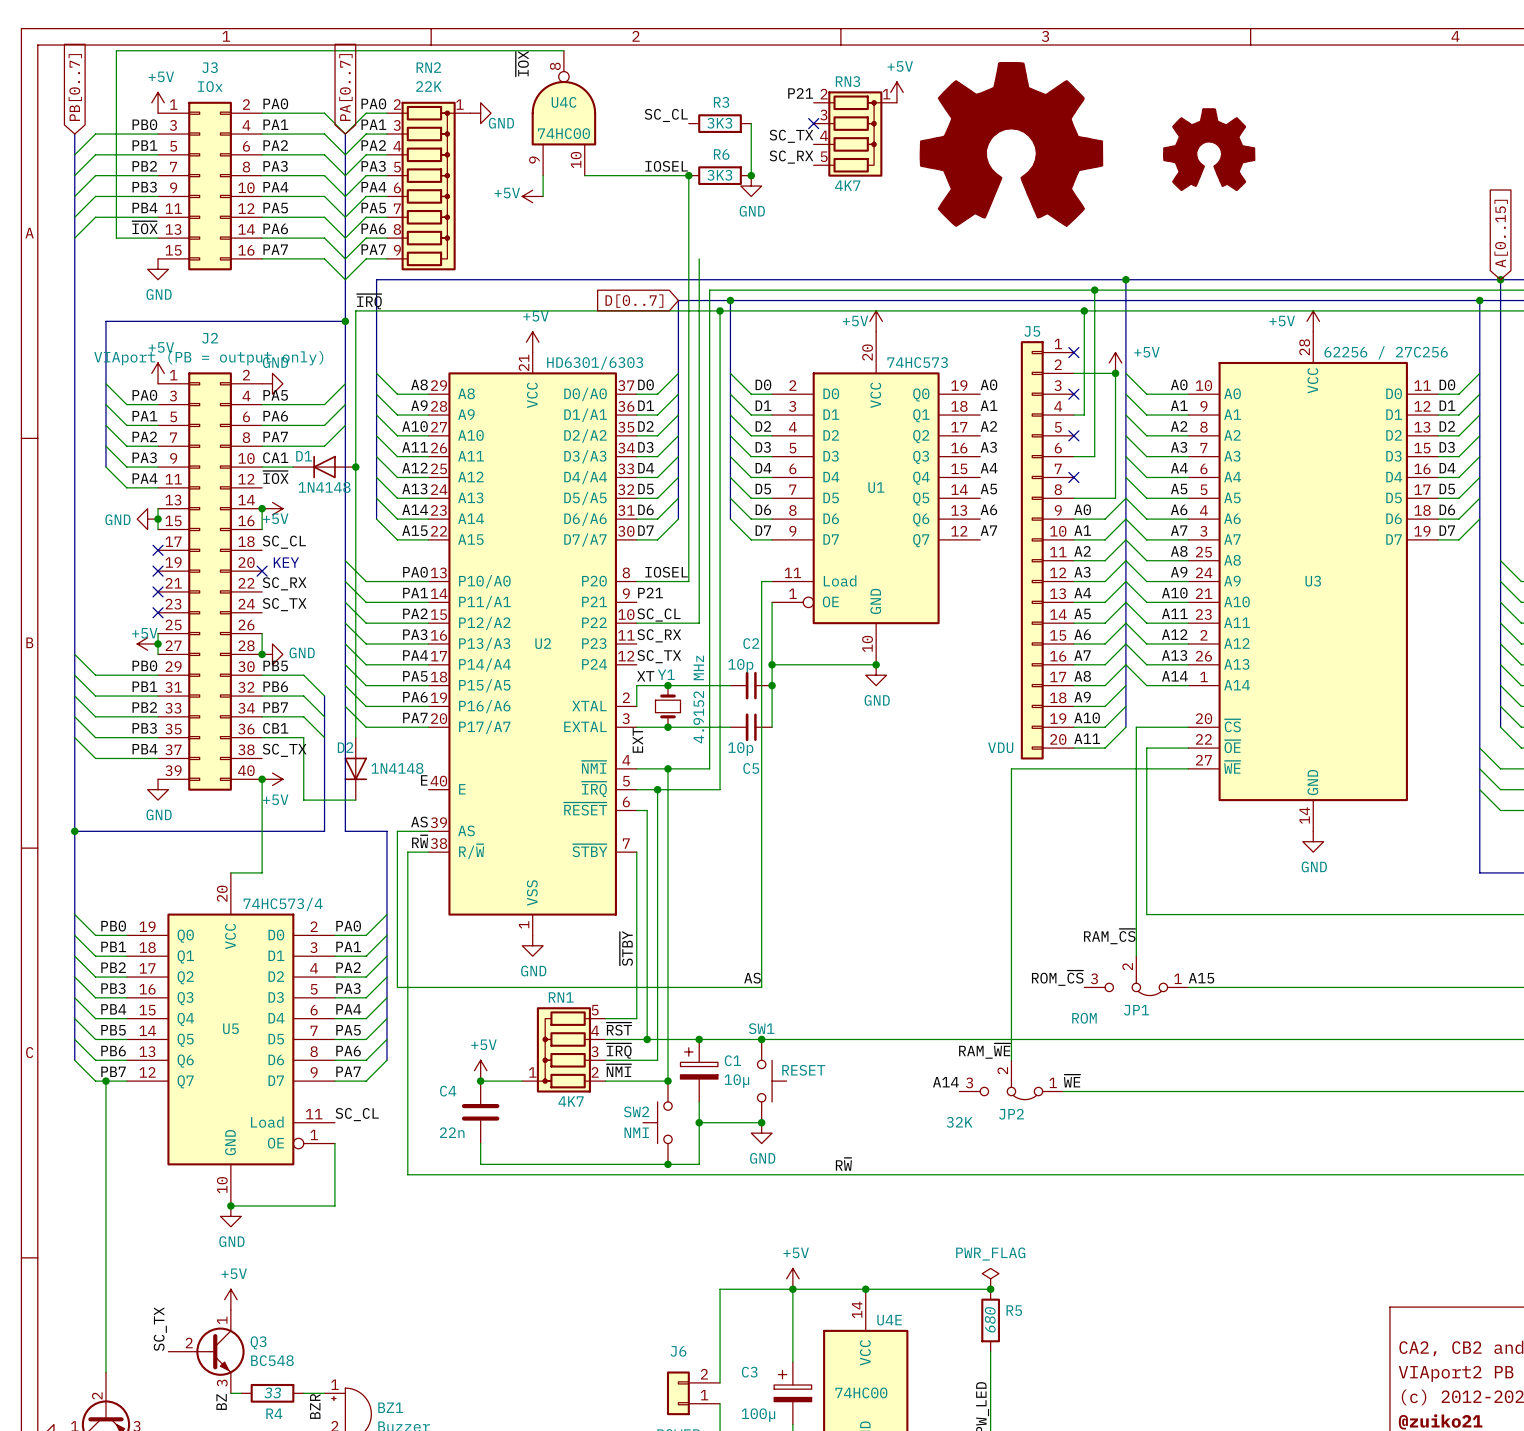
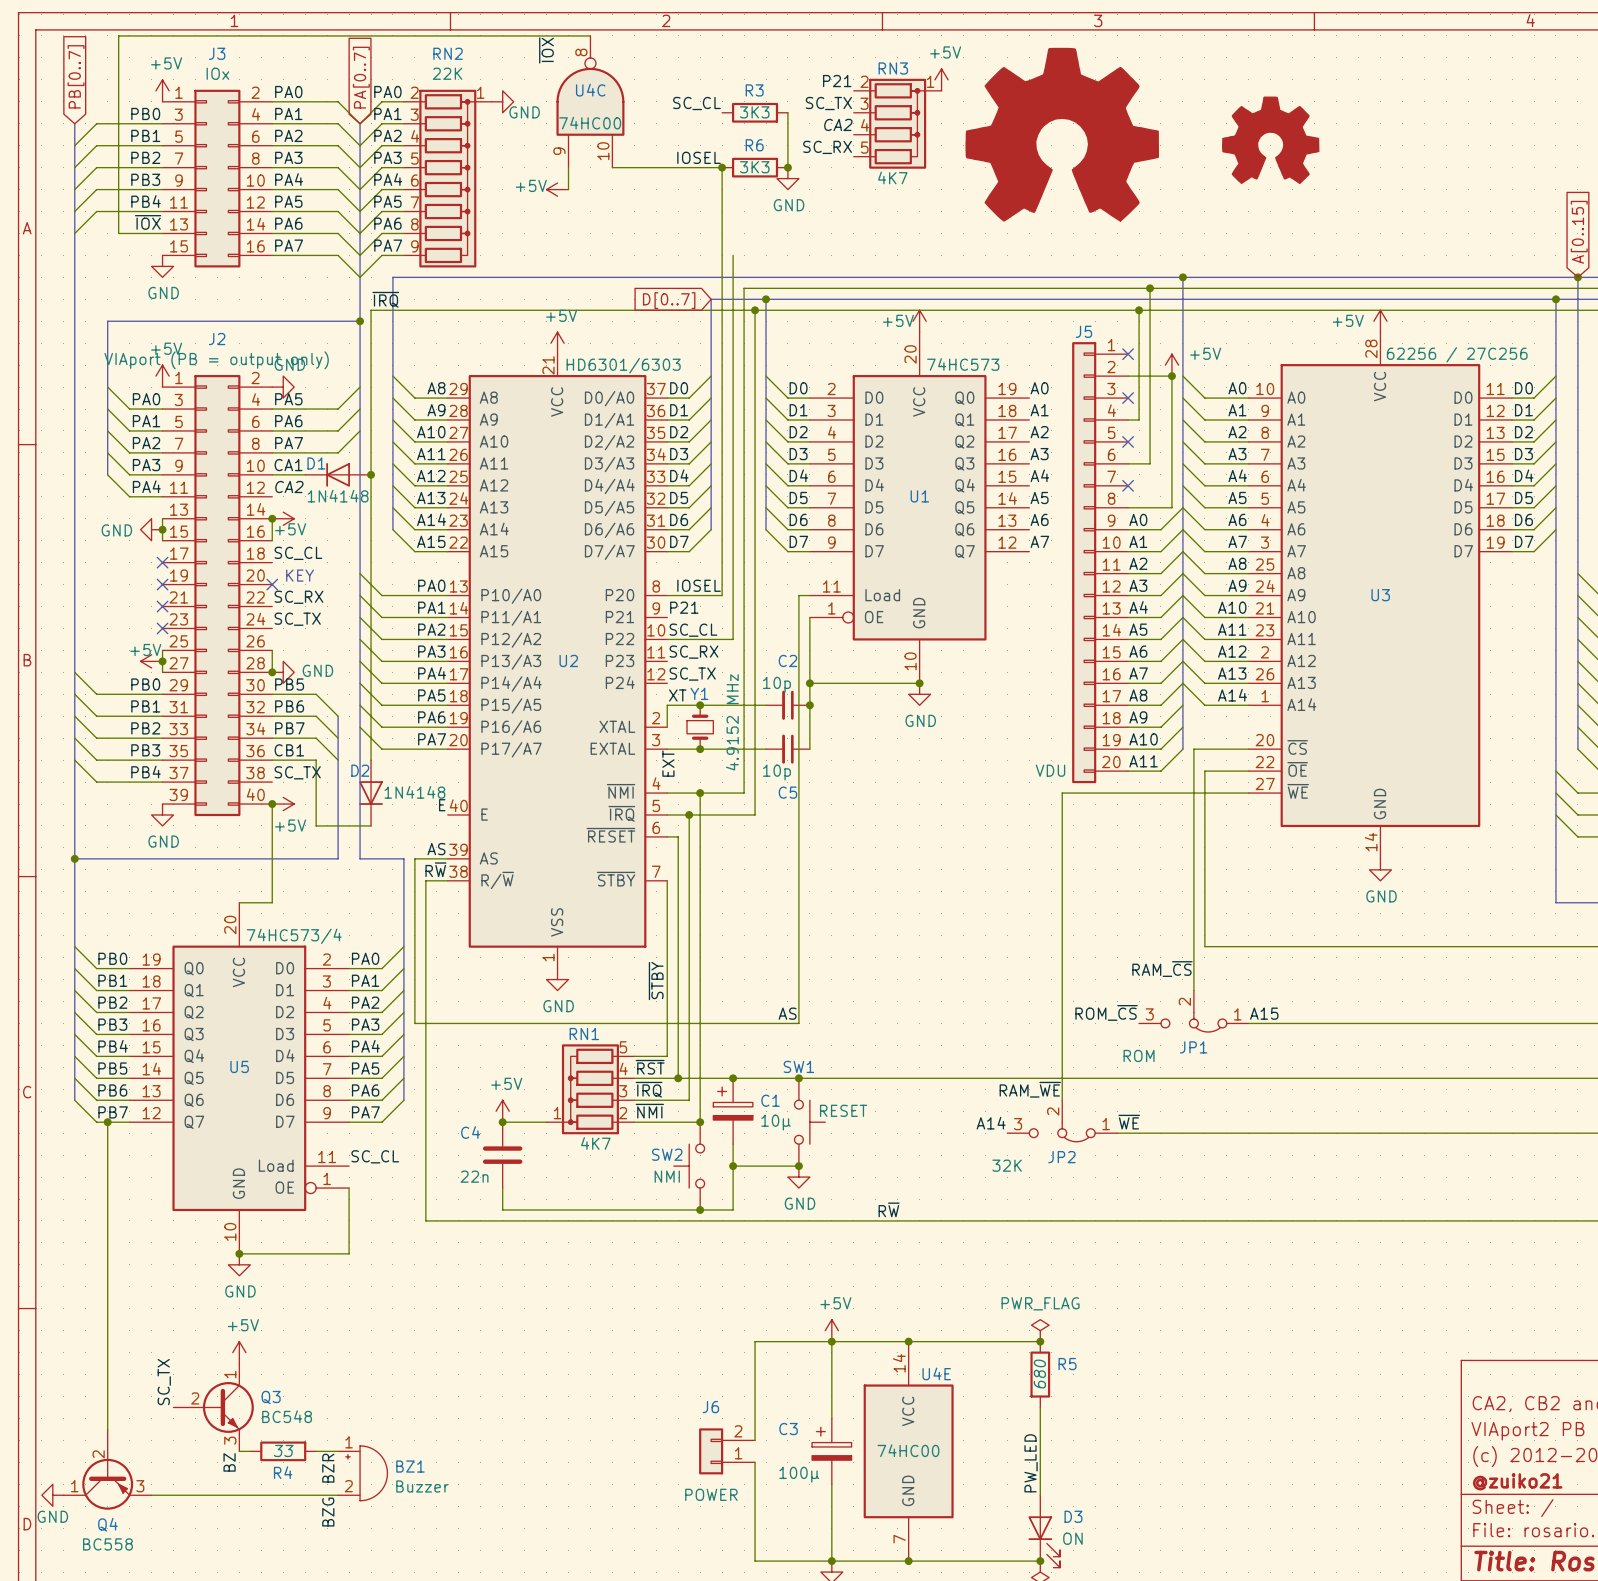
label: none -> SC_TX (828, 103)
no-connect mark: (813, 123) -> none
label: SC_TX (791, 136) -> CA2 (838, 124)
label: ~{IOX} (275, 477) -> CA2 (289, 487)

